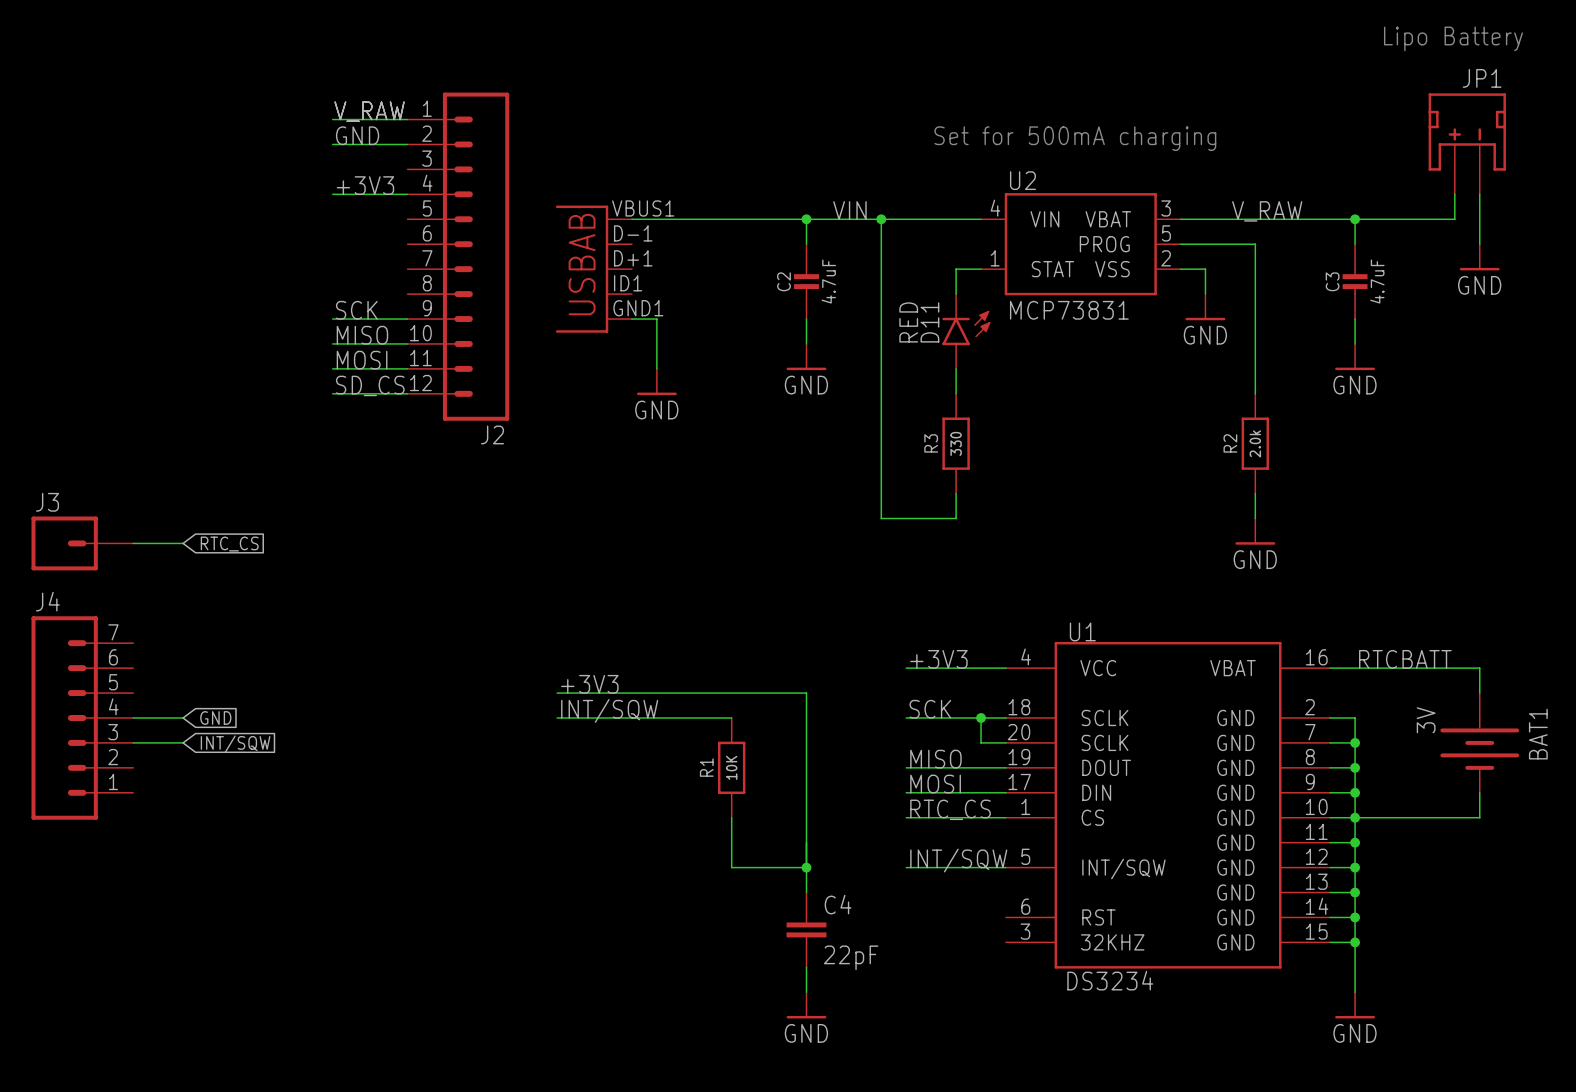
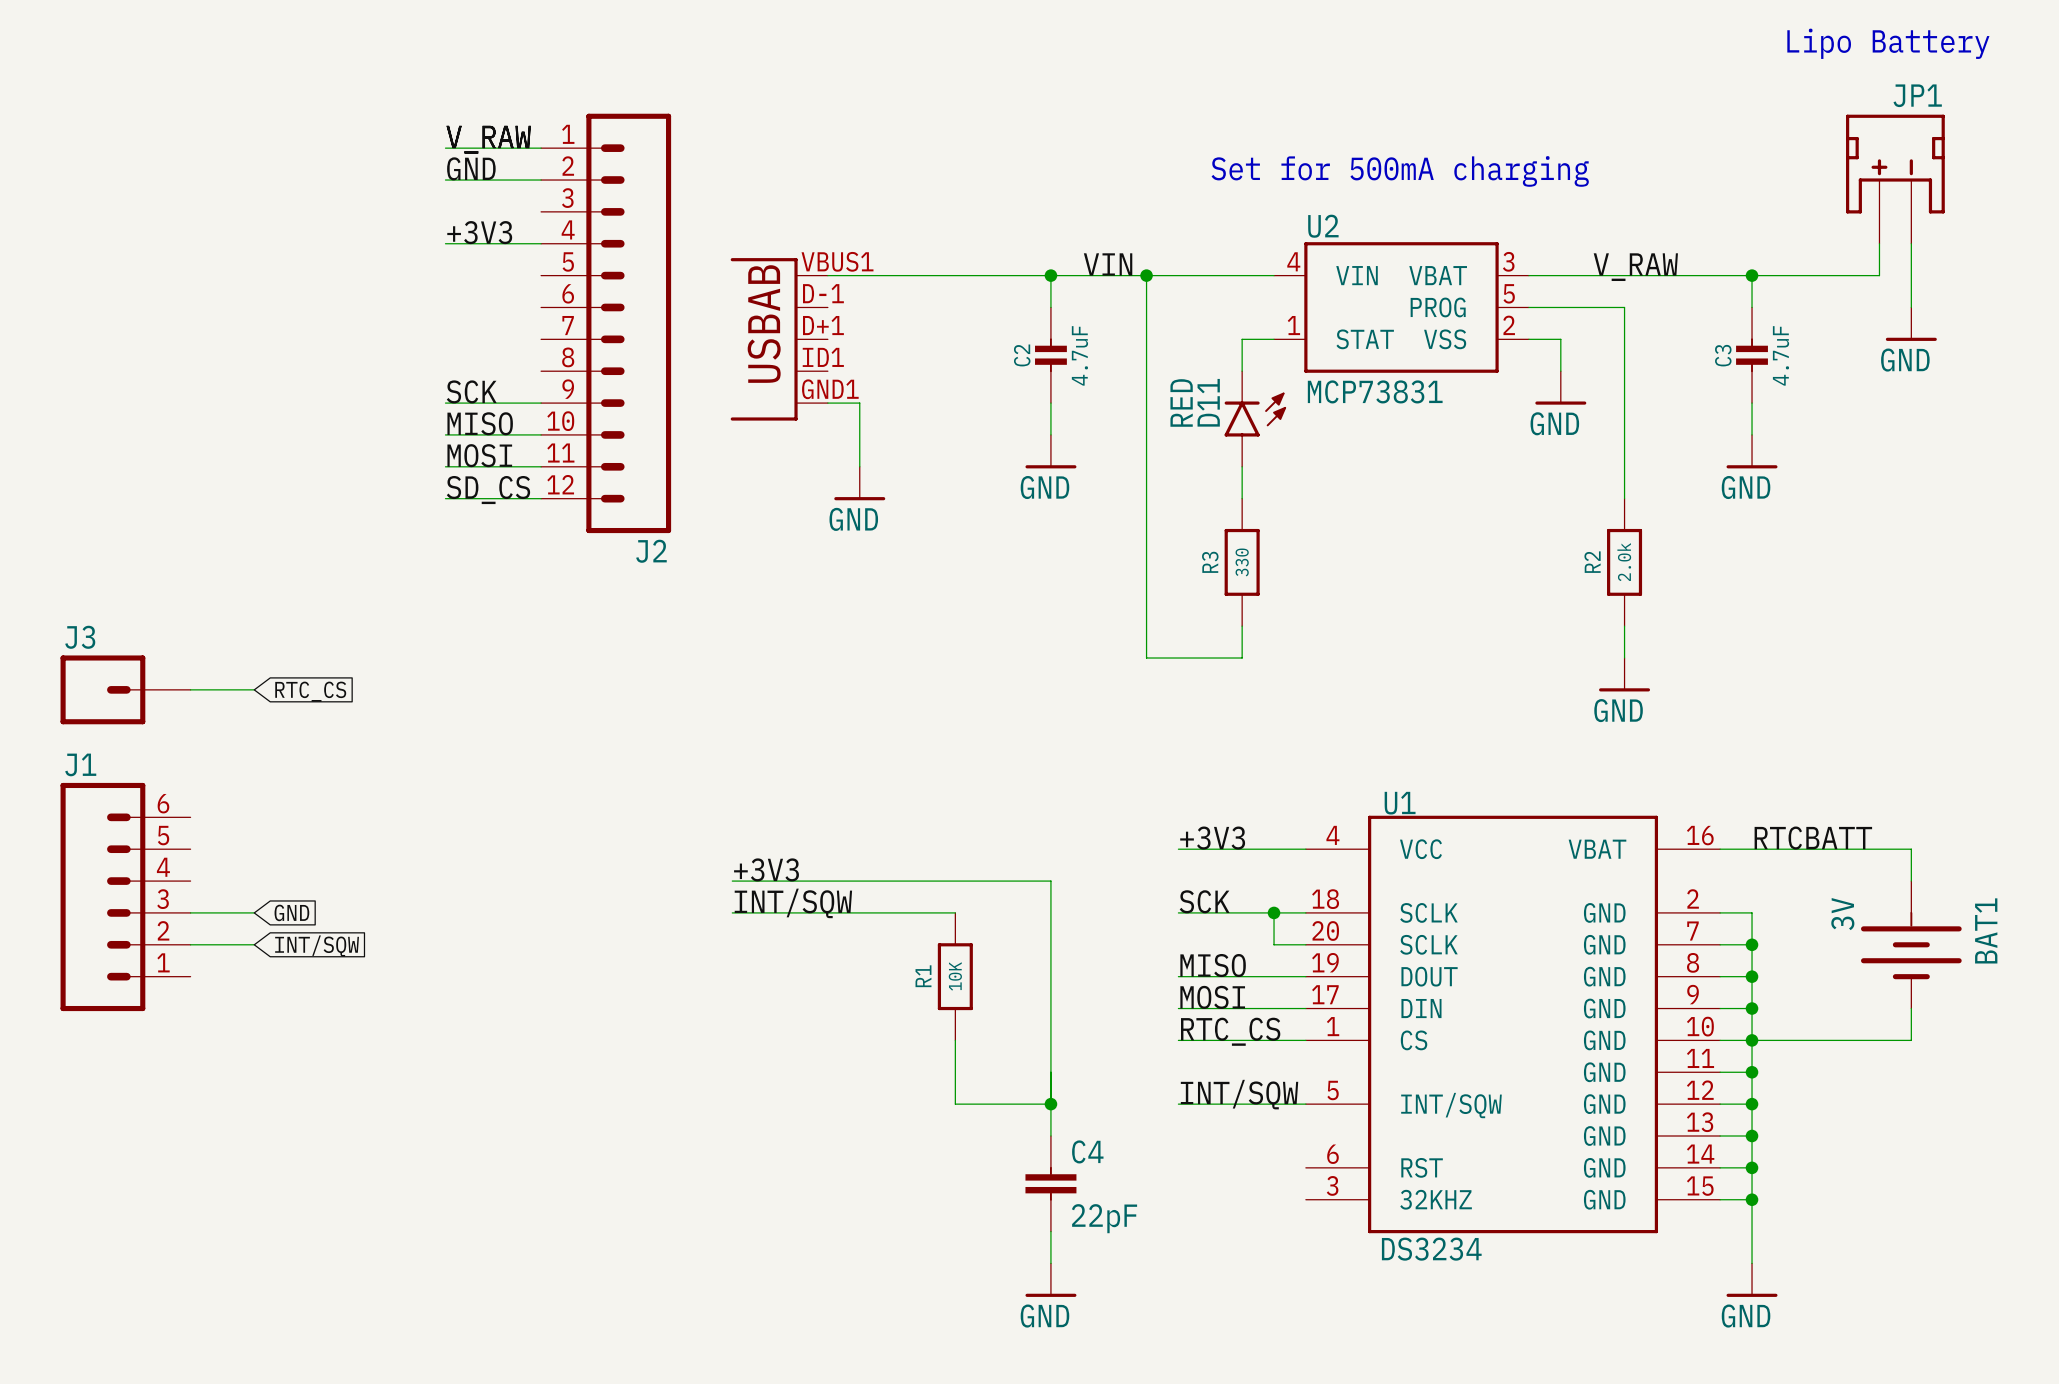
J1: none -> (125, 897)
J4: (82, 717) -> none

